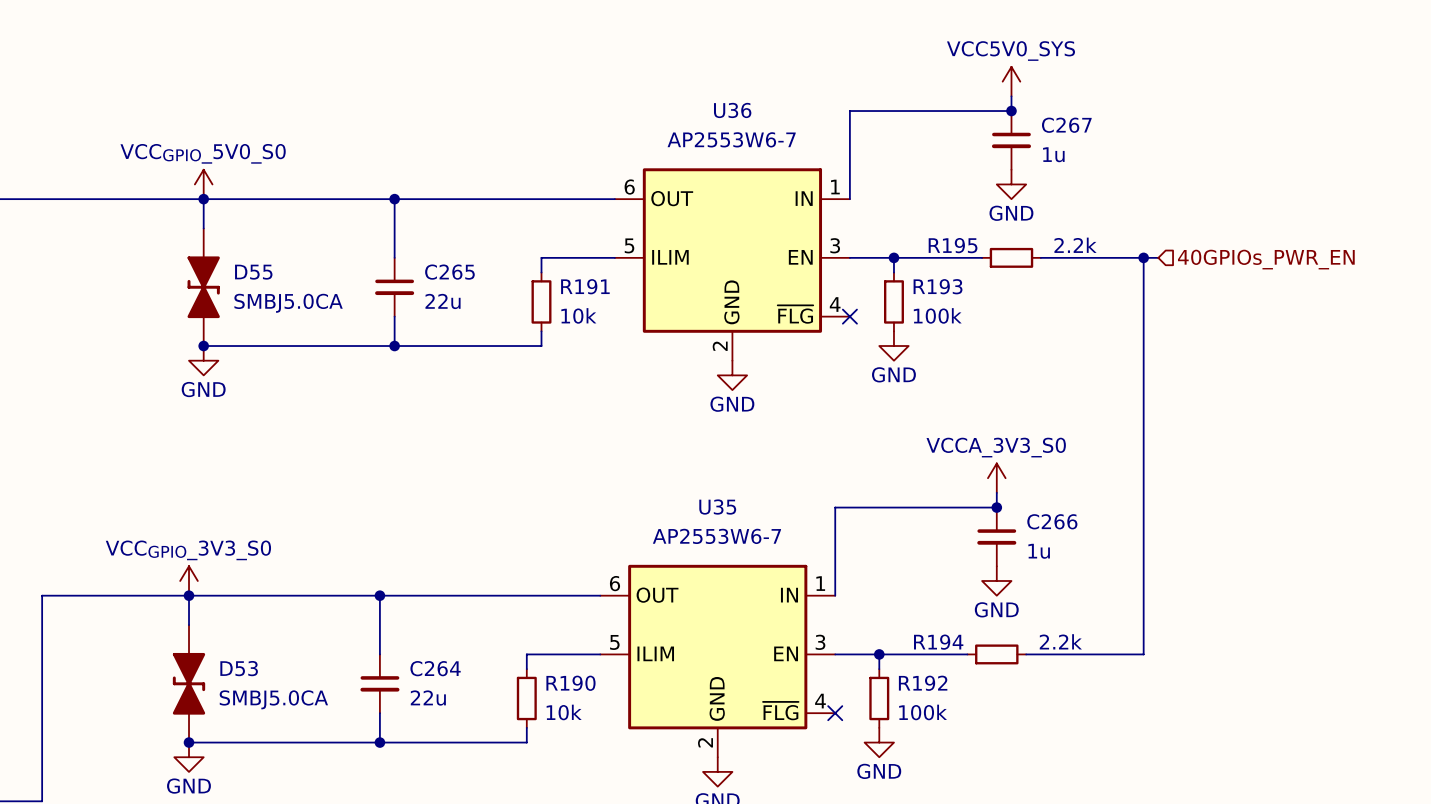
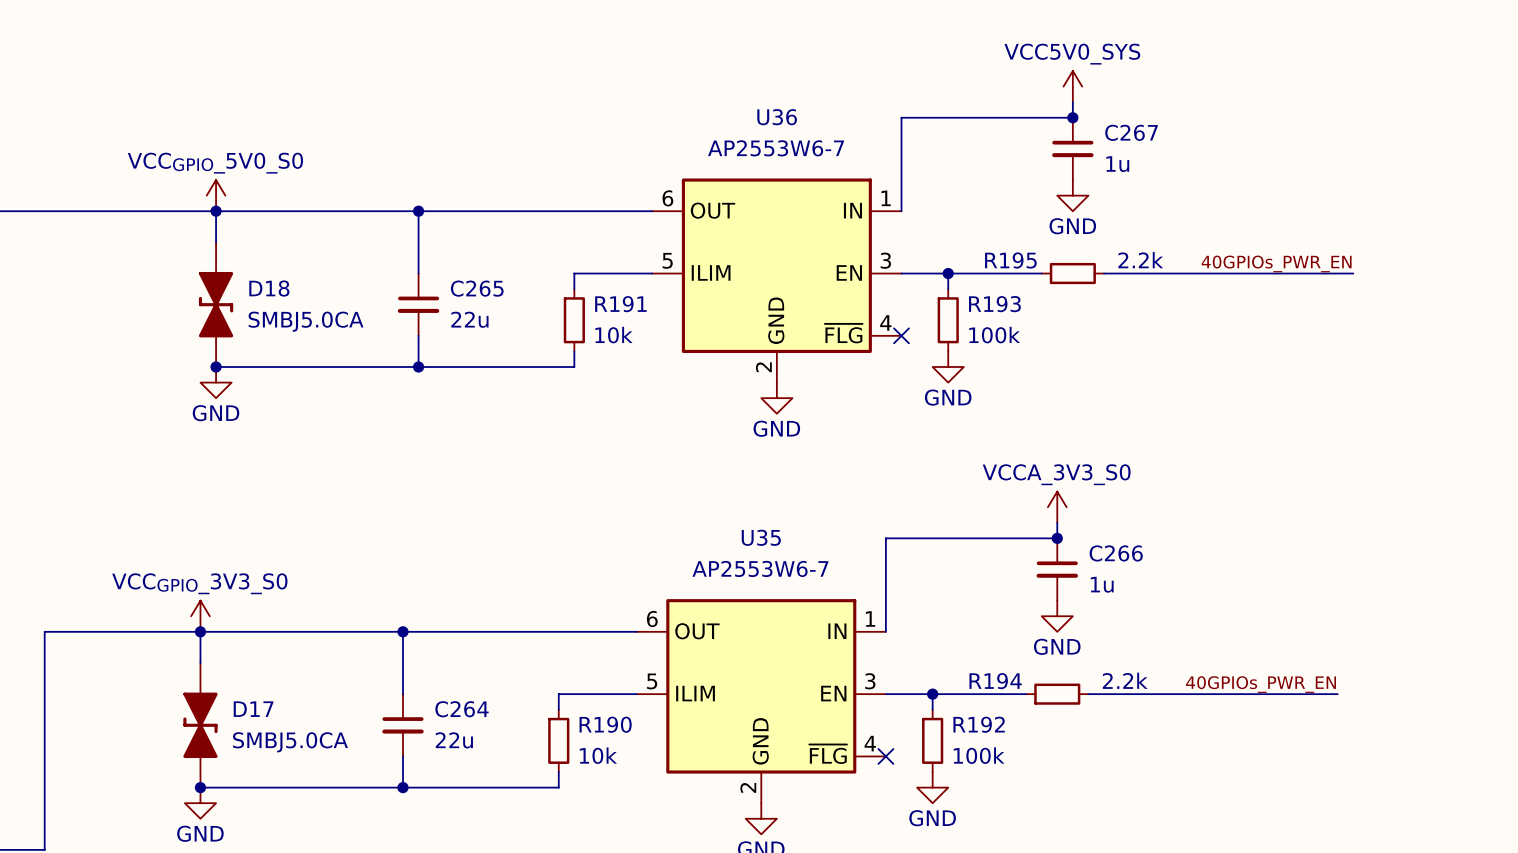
label: none -> 40GPIOs_PWR_EN (1276, 263)
wire: (1143, 257) (1143, 654) -> (1337, 694) (1213, 694)
junction: (1143, 257) -> none
wire: none -> (1228, 273) (1353, 273)
hierarchical label: 40GPIOs_PWR_EN (1266, 259) -> none
D55 name: D55 (253, 272) -> D18 (269, 288)
label: none -> 40GPIOs_PWR_EN (1261, 684)
D53 name: D53 (239, 668) -> D17 (253, 709)

